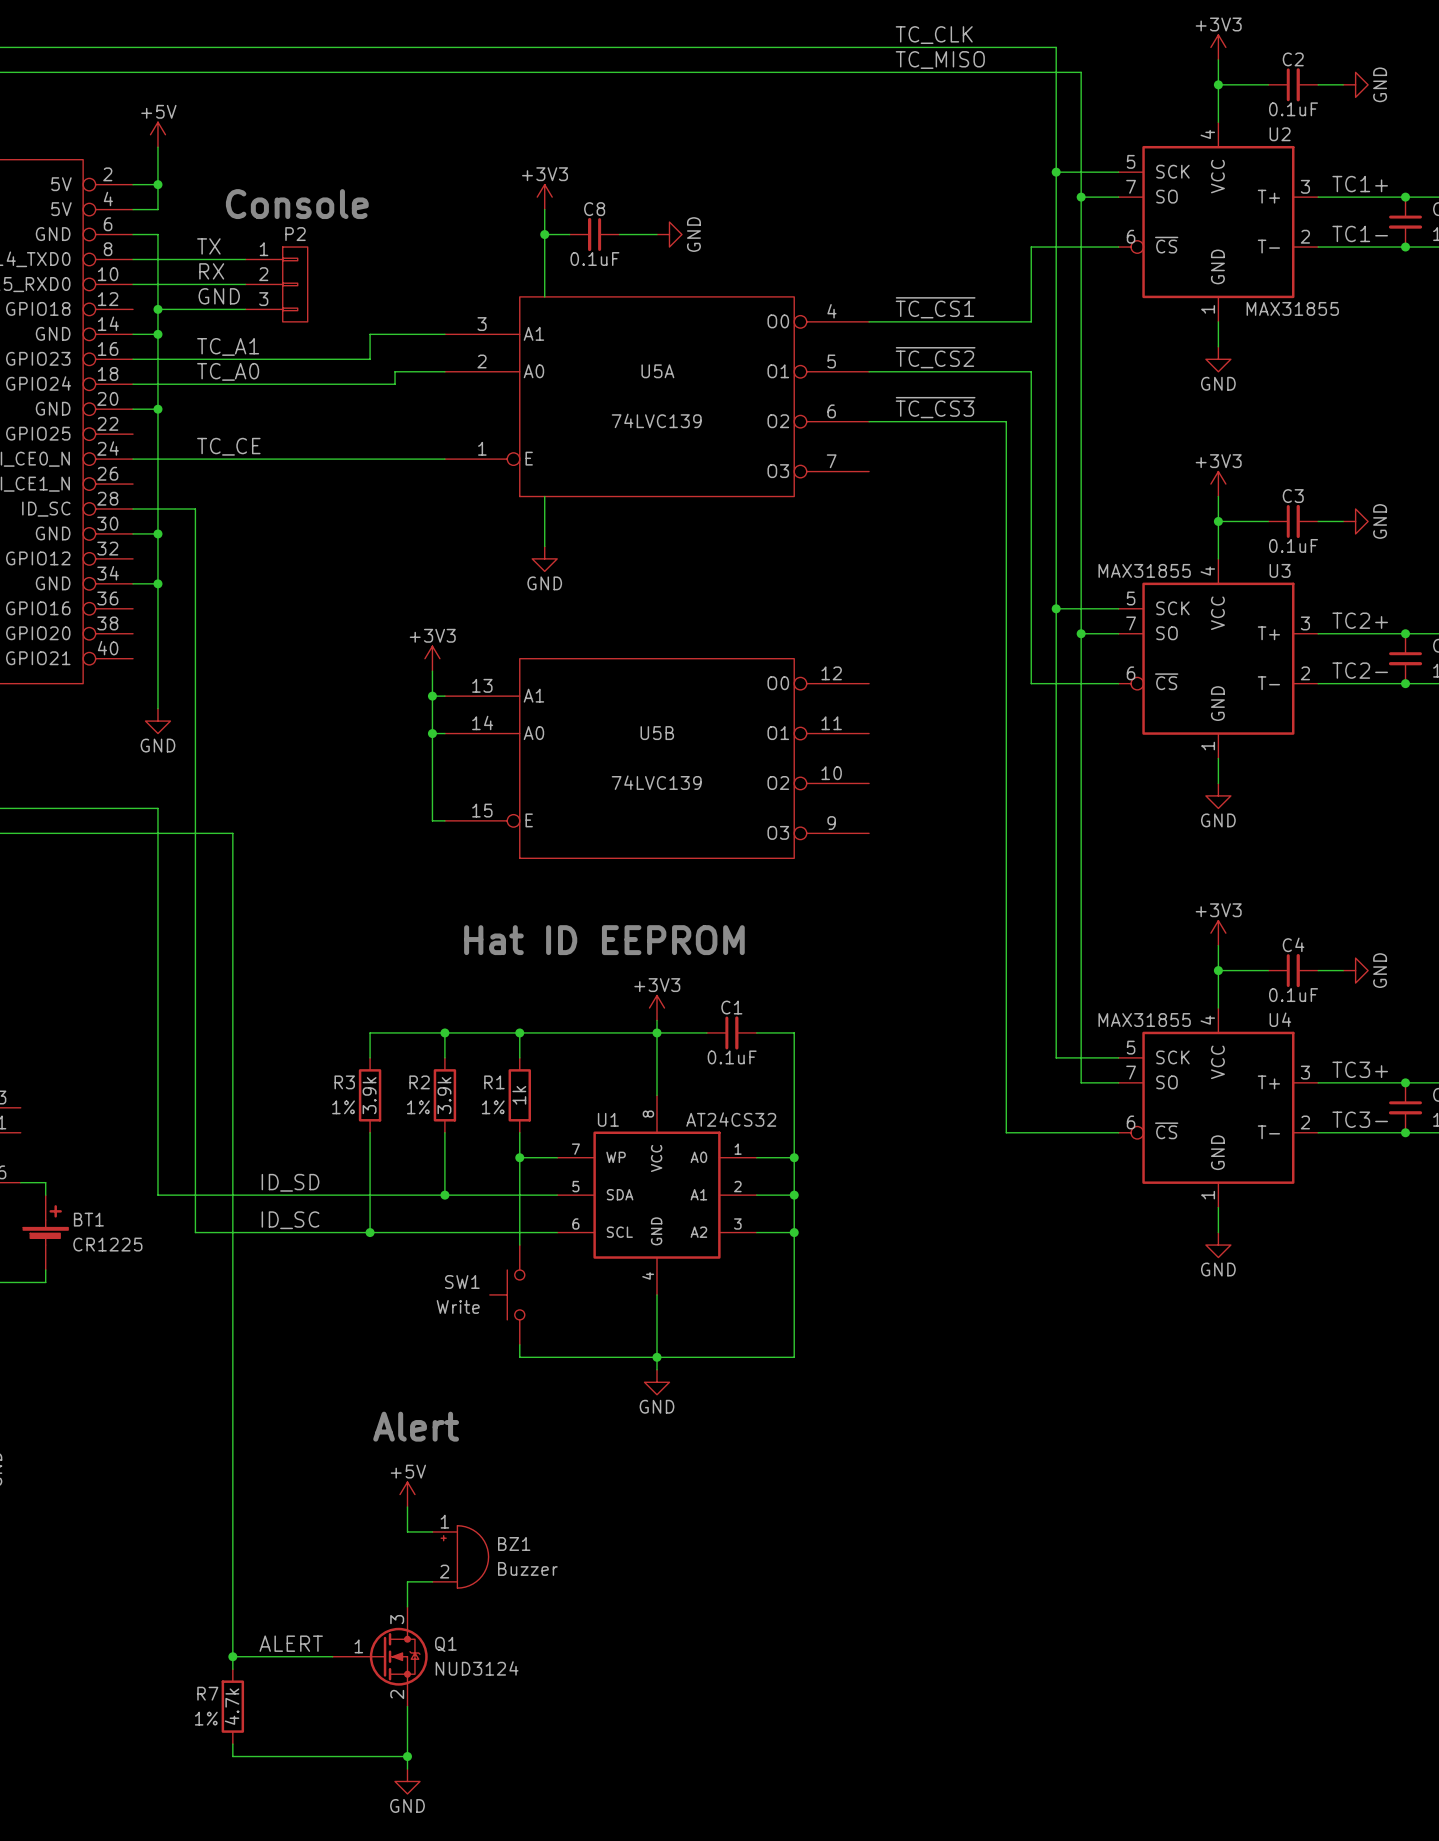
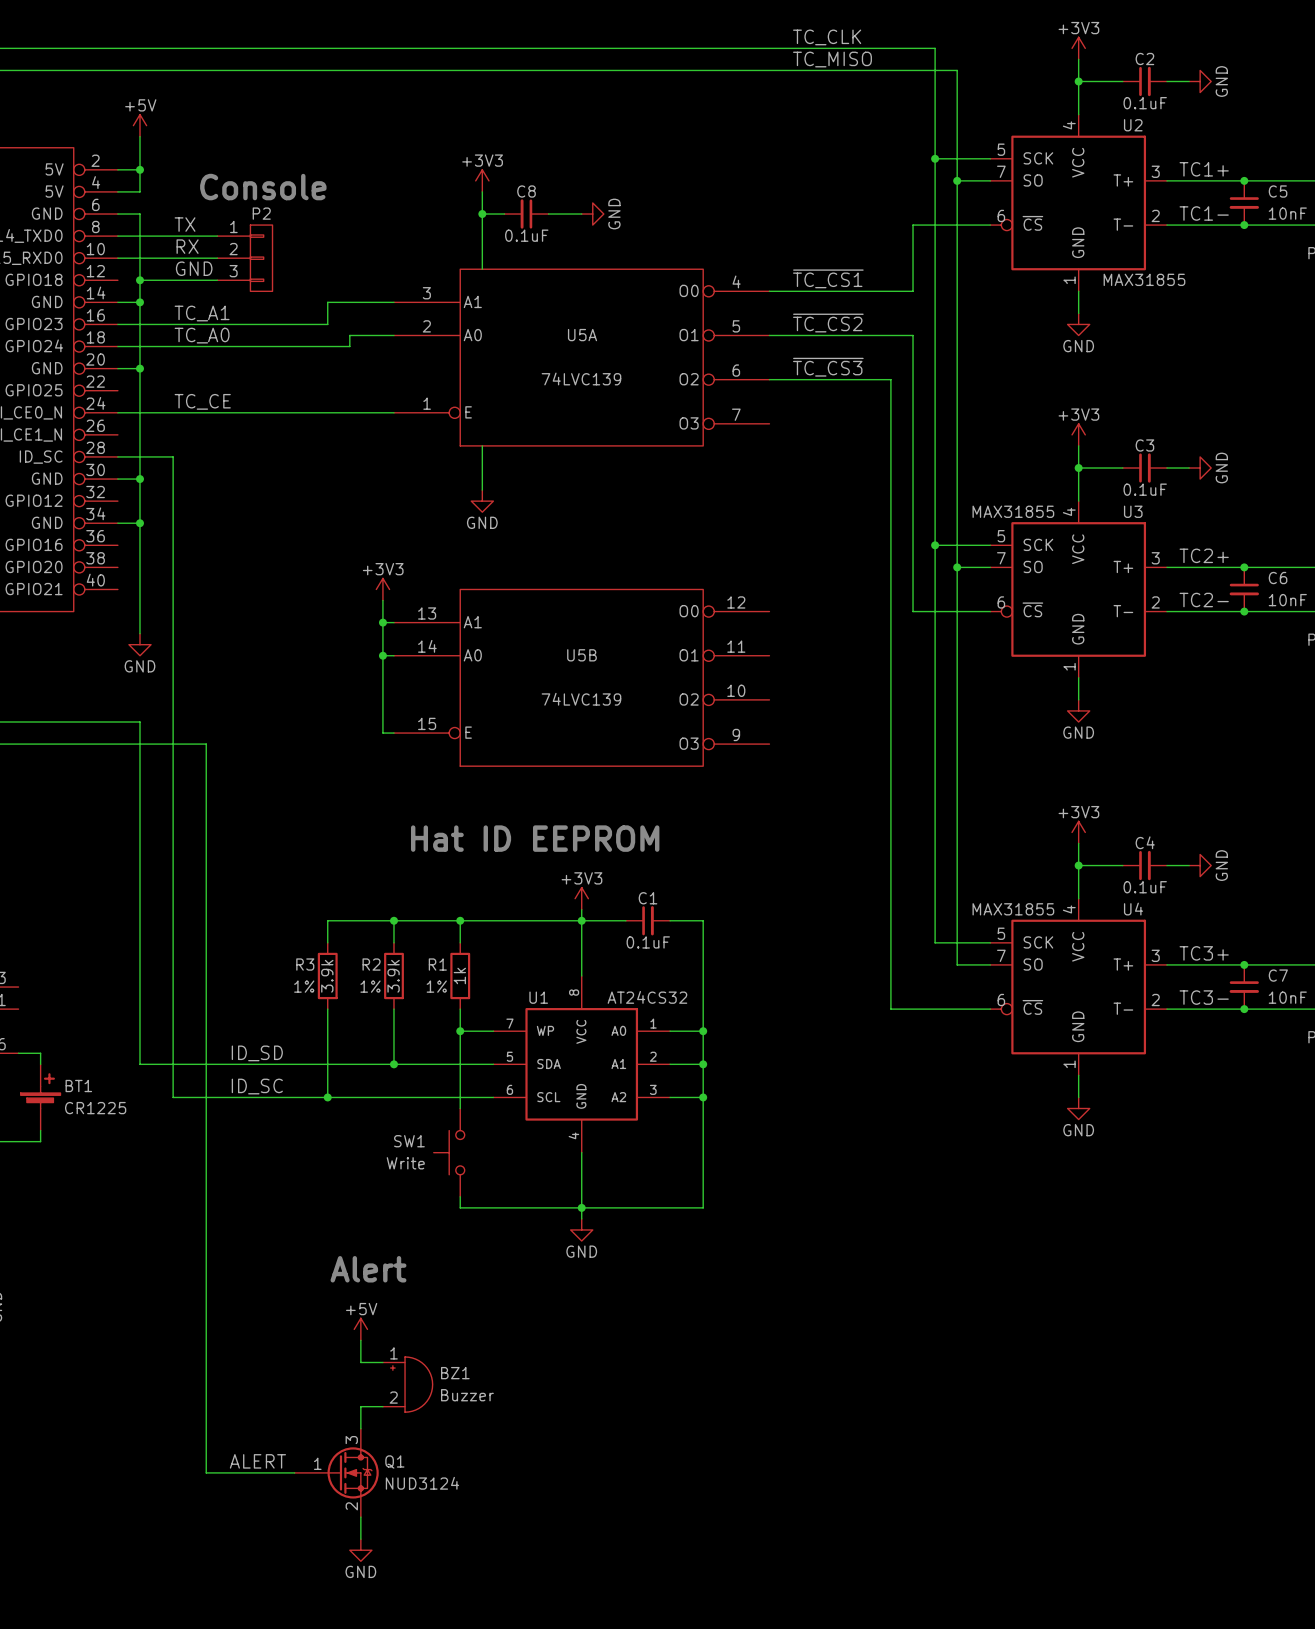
wire: (232, 1656) (232, 1669) -> none
junction: (232, 1656) -> none
R7: 4.7k (232, 1706) -> none
wire: (407, 1731) (407, 1769) -> none
wire: (232, 1744) (232, 1756) (407, 1756) -> none
junction: (407, 1756) -> none
power symbol position: GND (407, 1781) -> GND (360, 1550)

